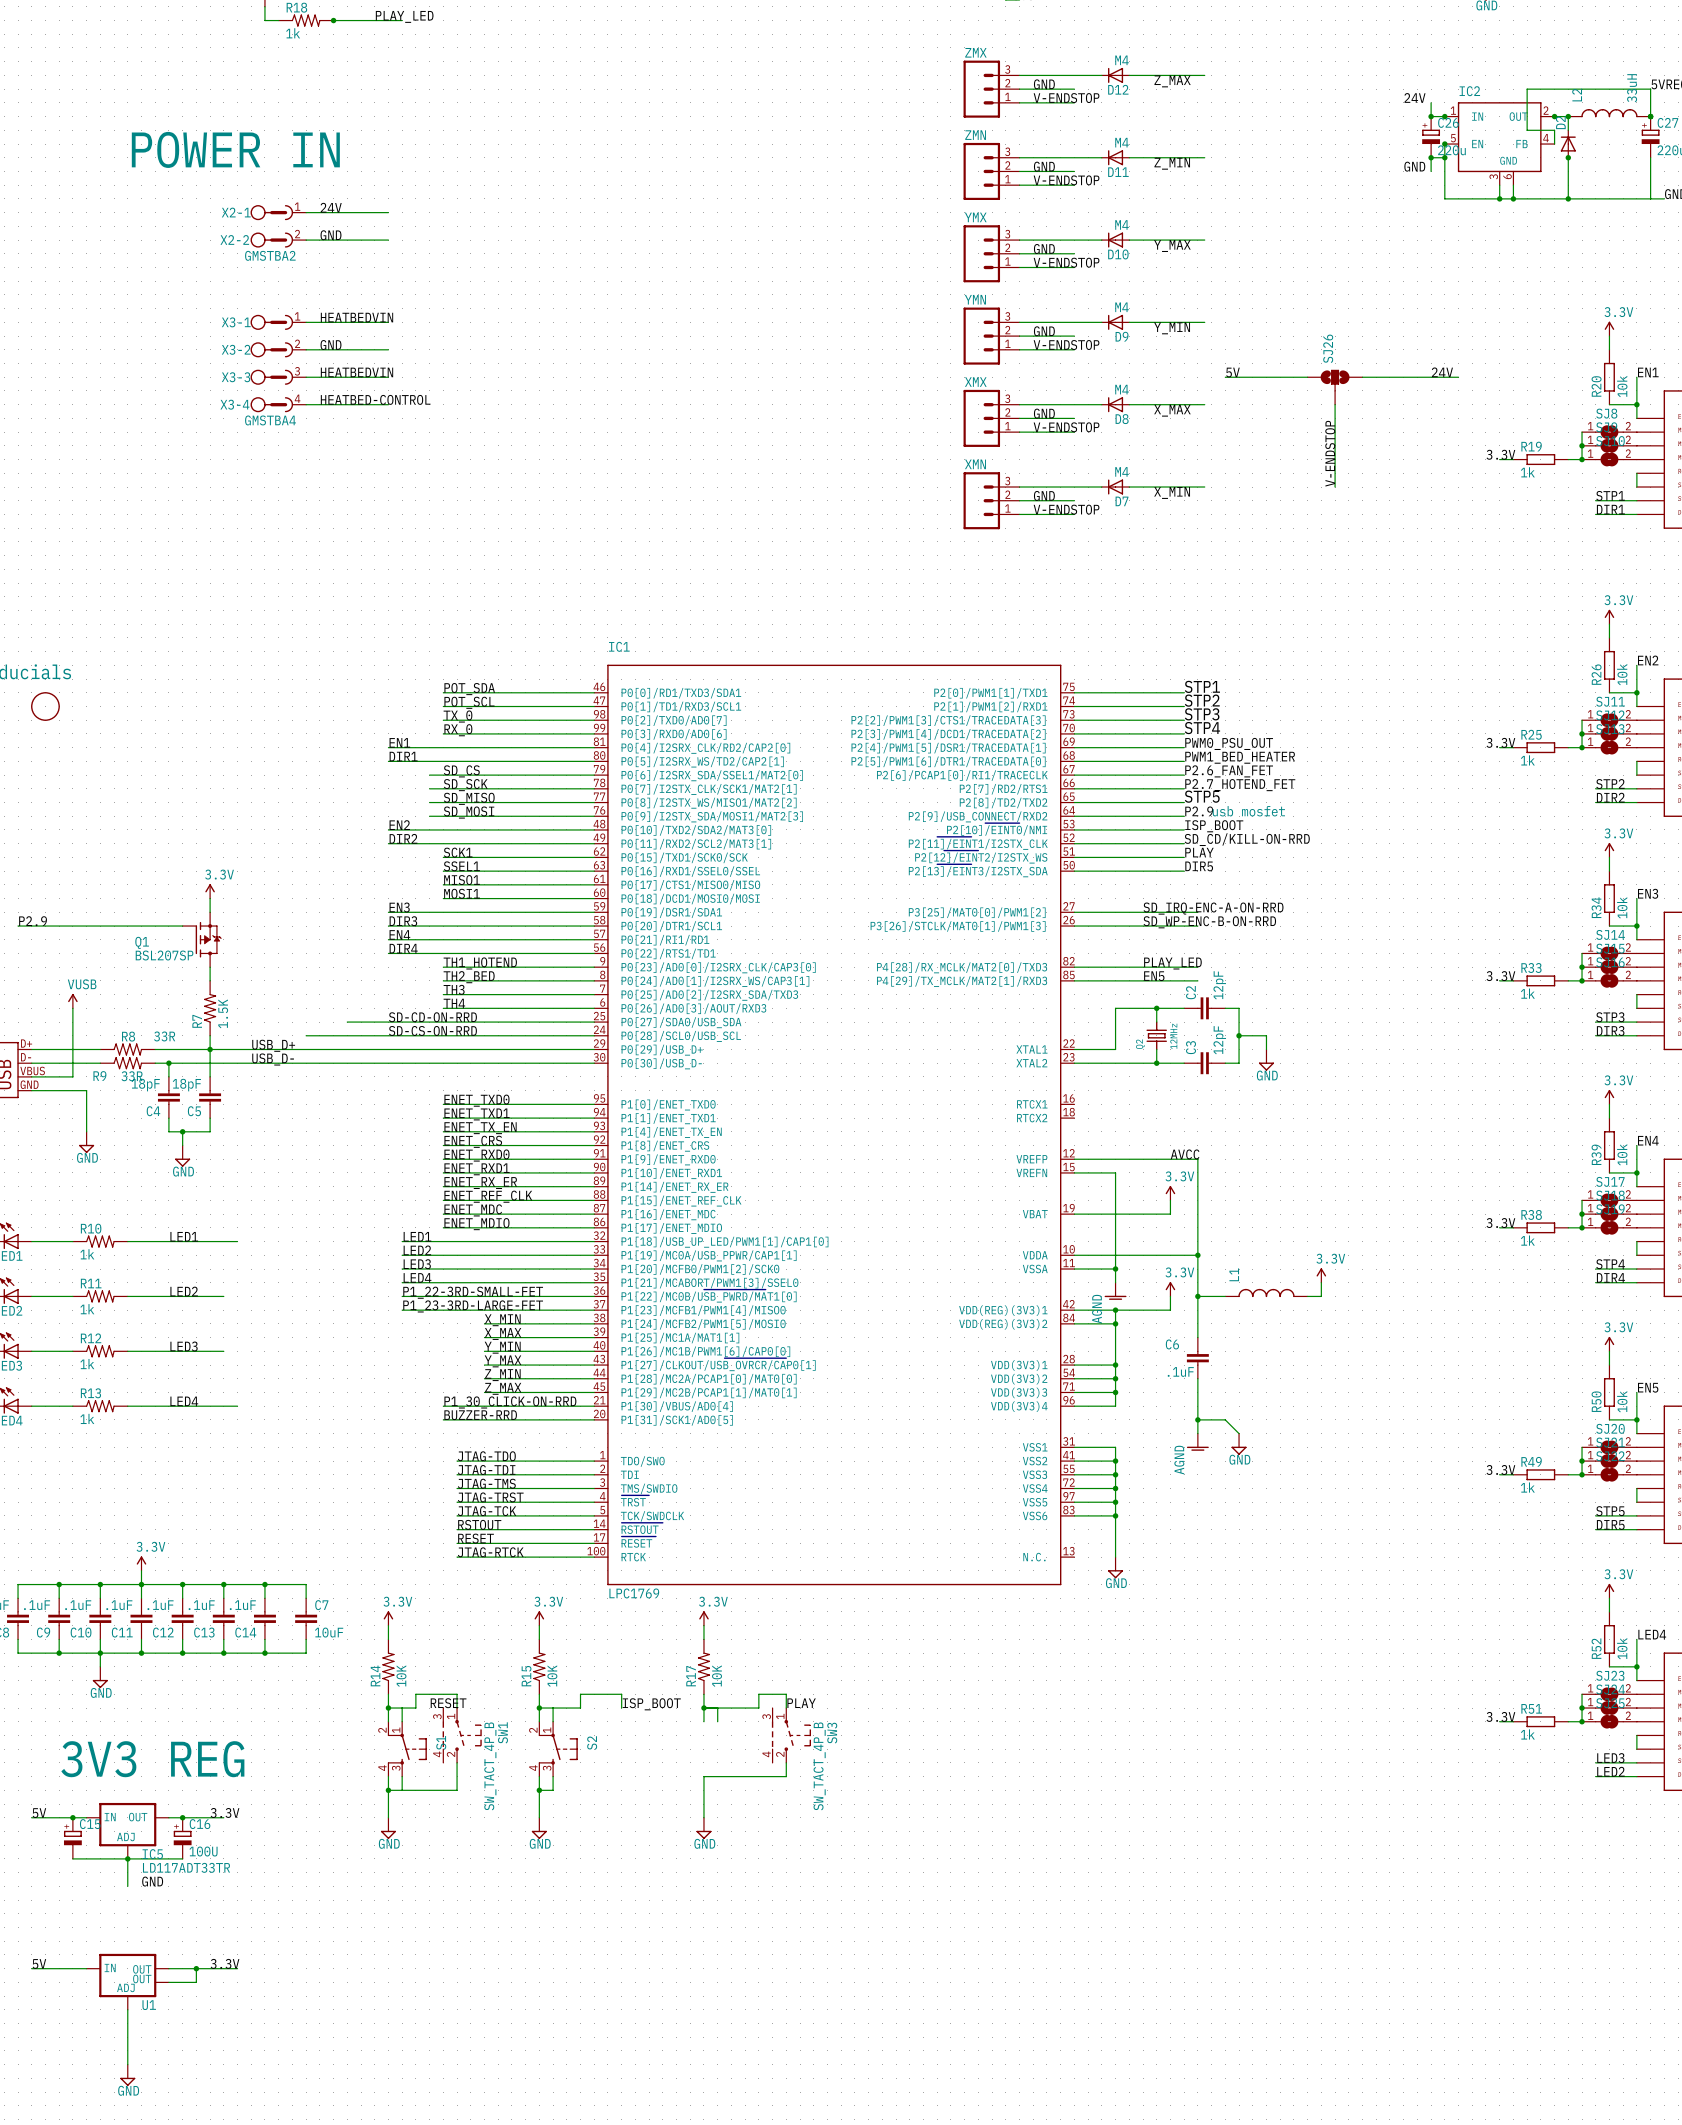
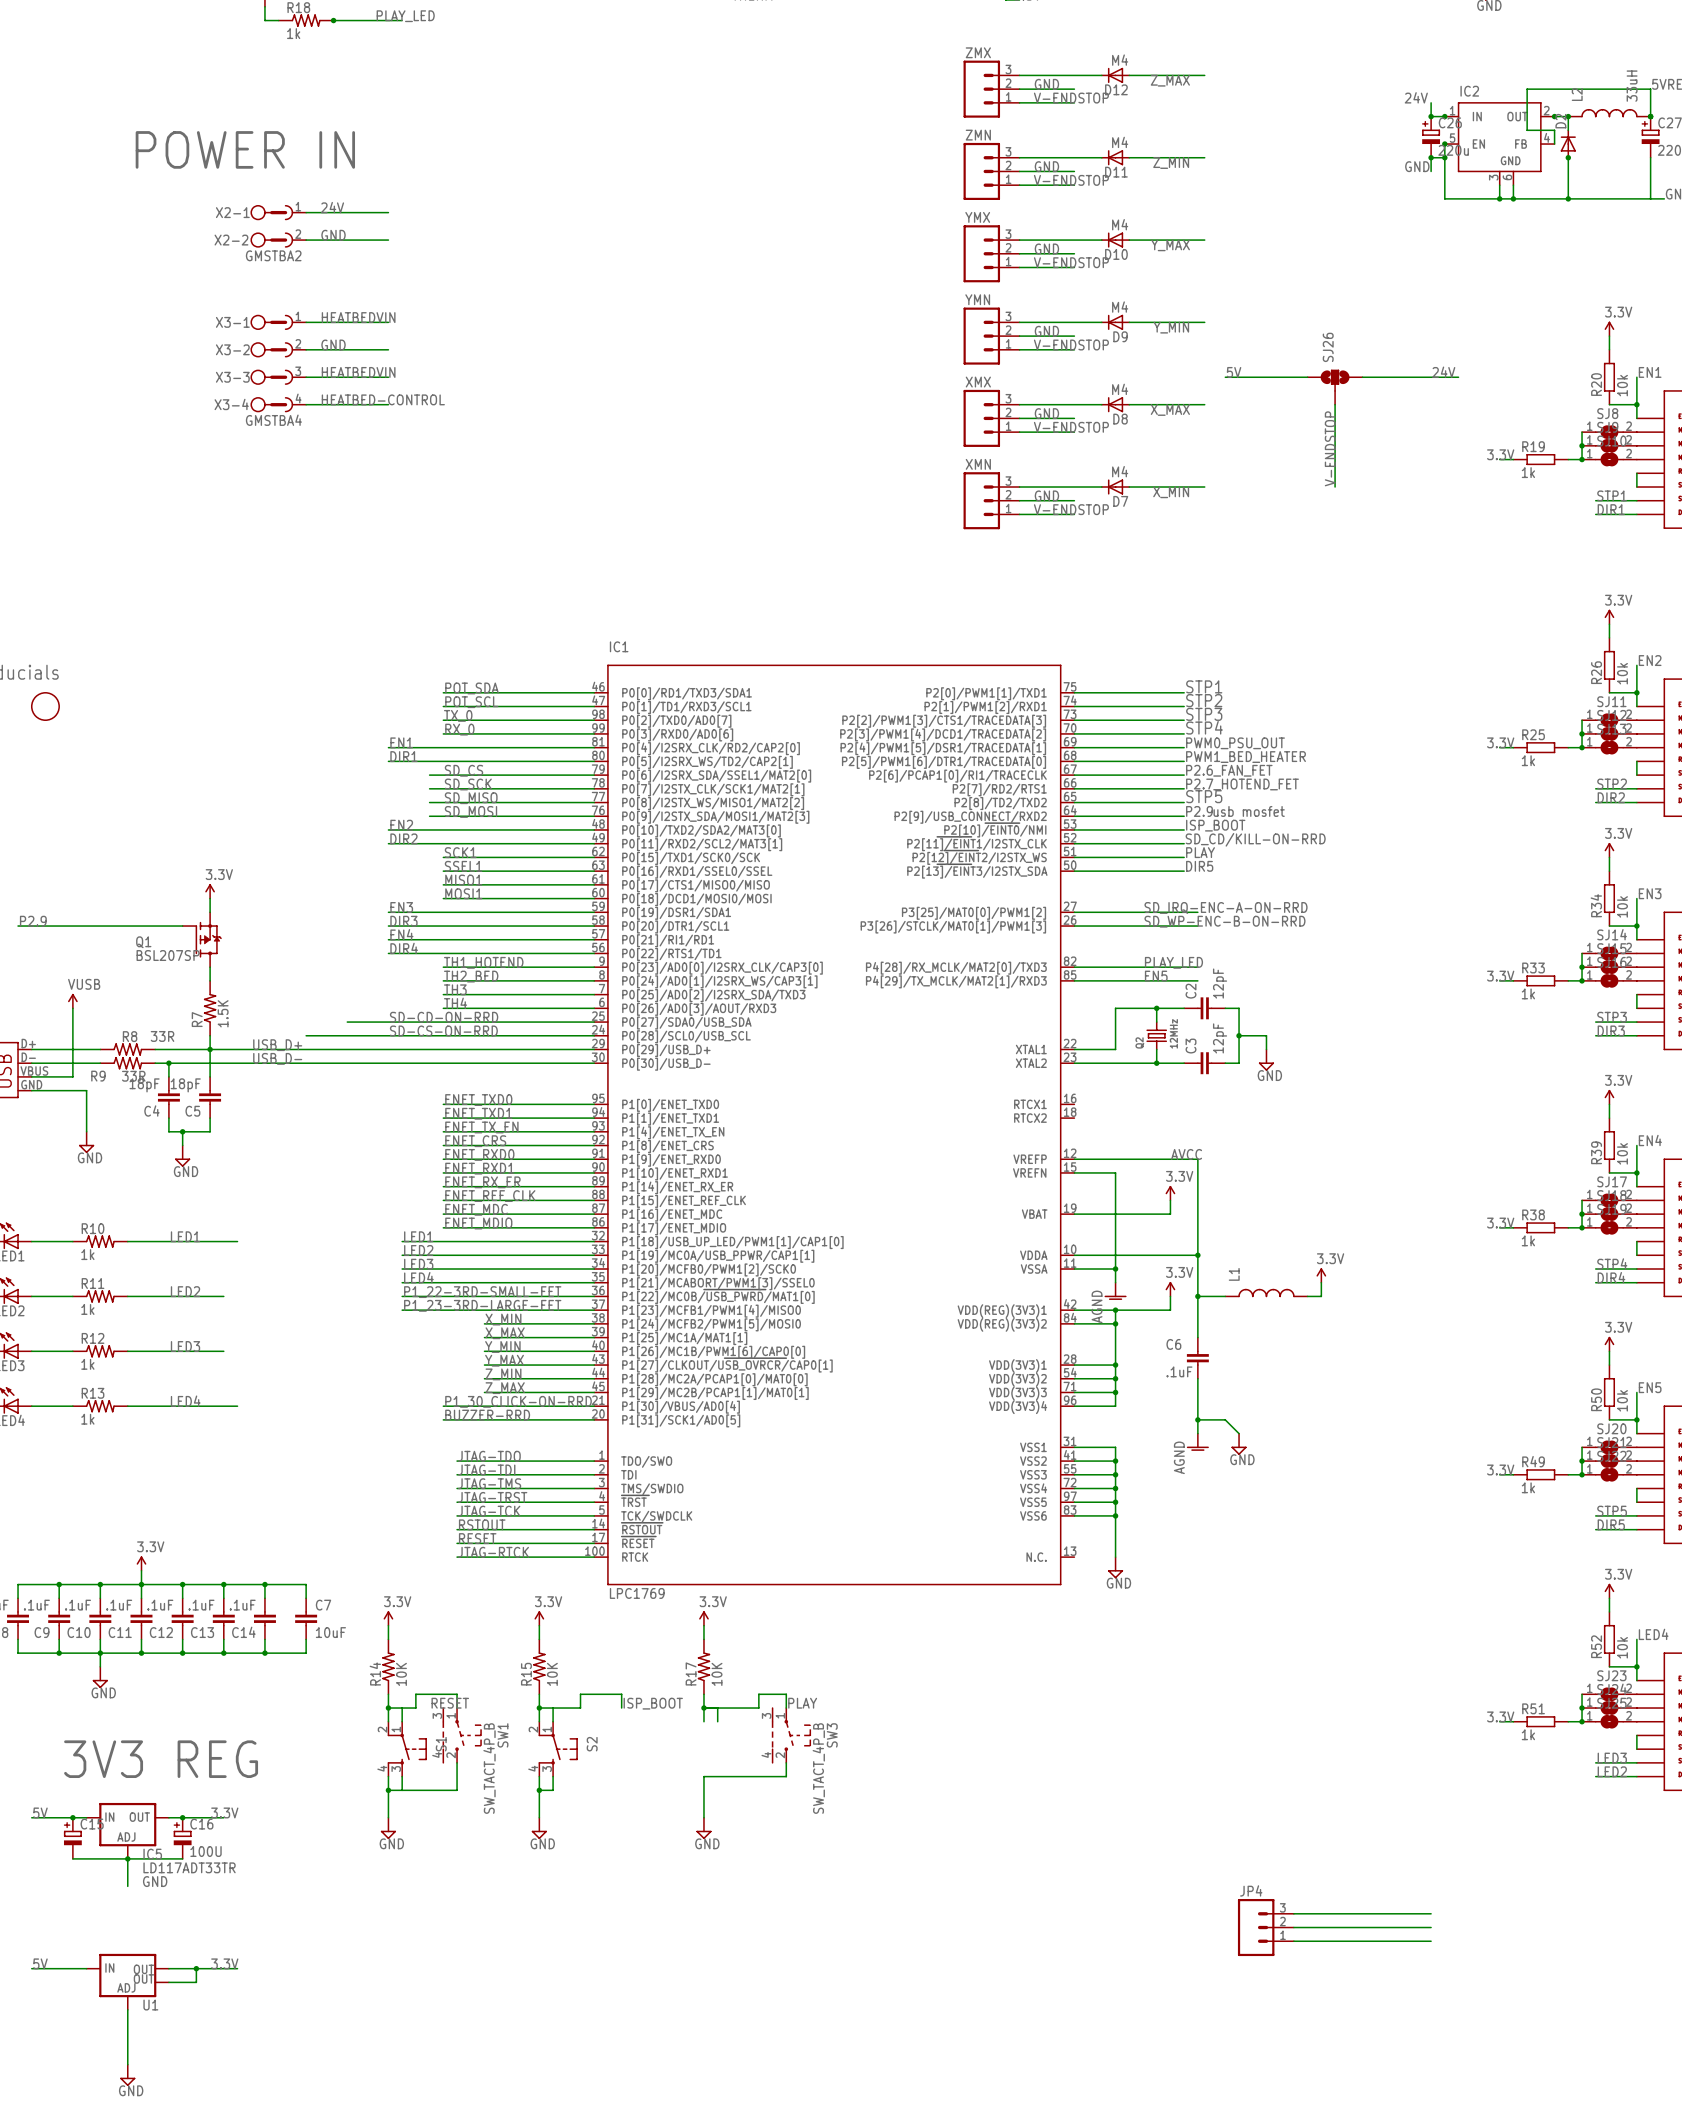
wire: none -> (1293, 1913) (1431, 1913)
JP4: none -> (1265, 1927)
wire: none -> (1293, 1927) (1431, 1927)
wire: none -> (1293, 1941) (1431, 1941)

